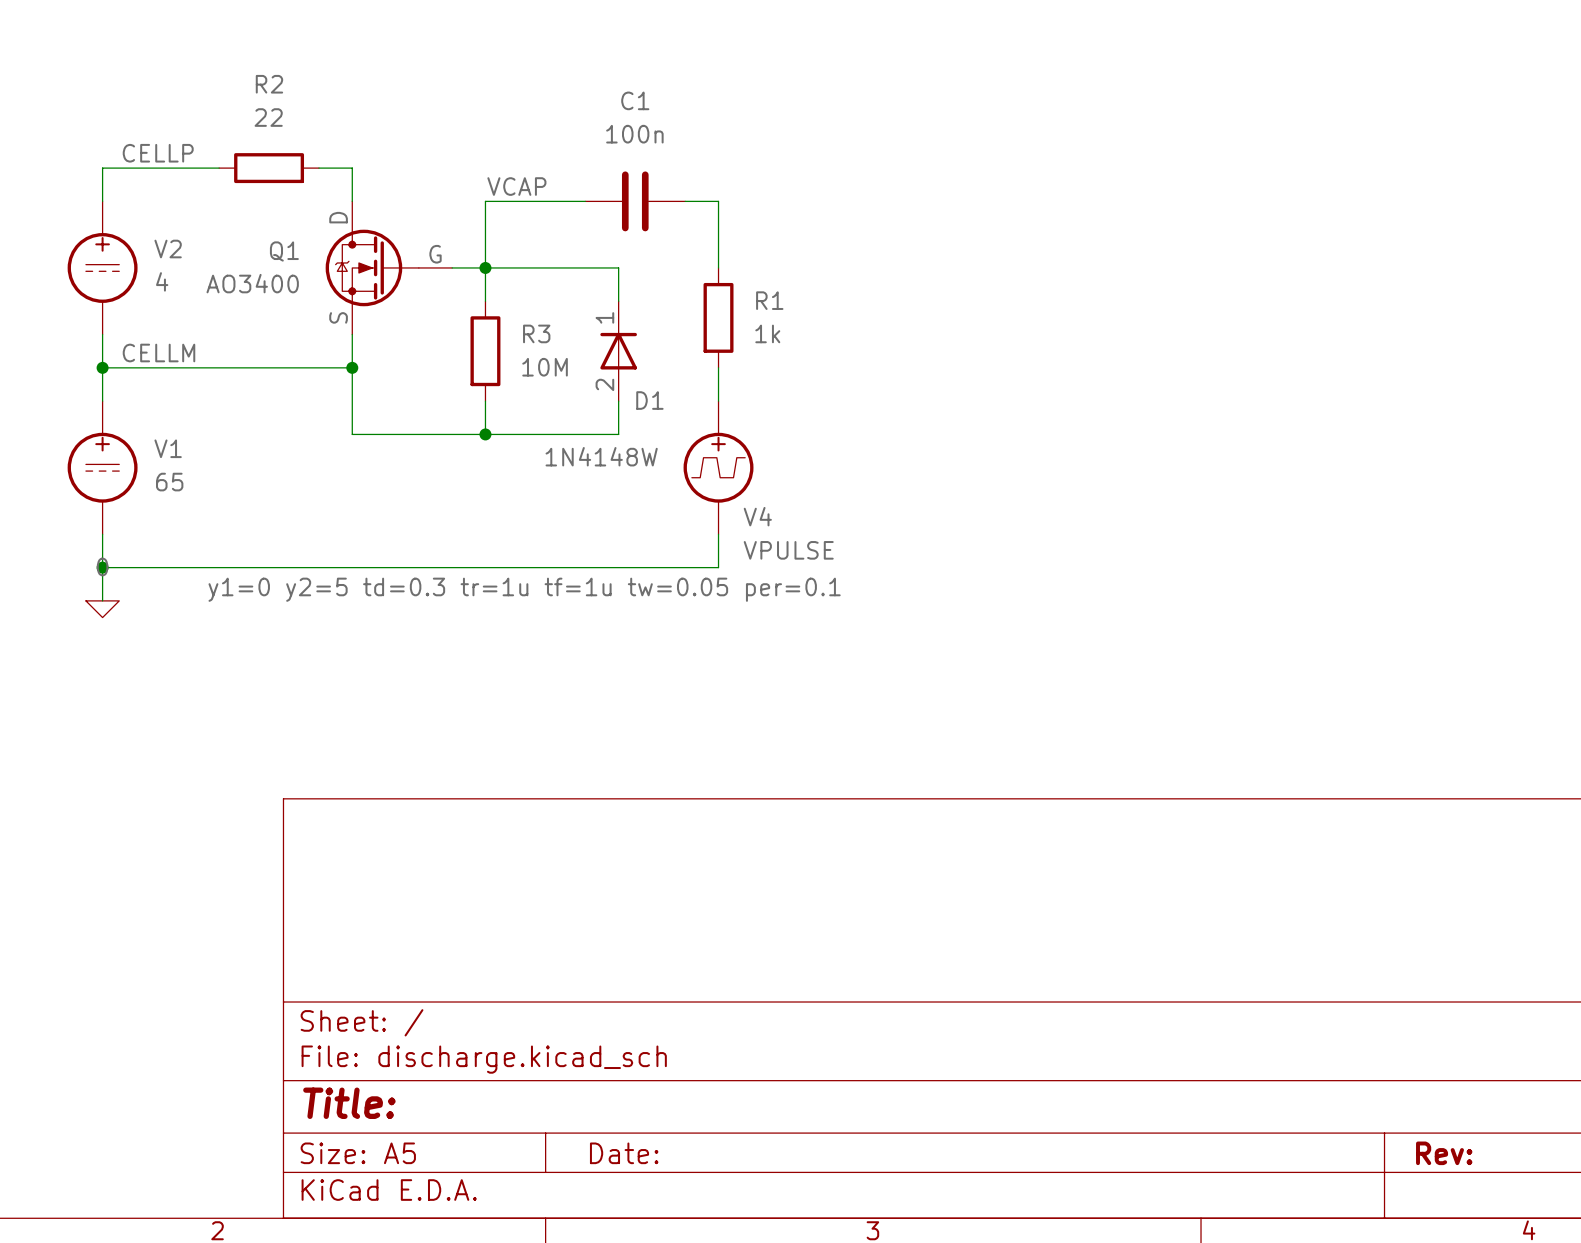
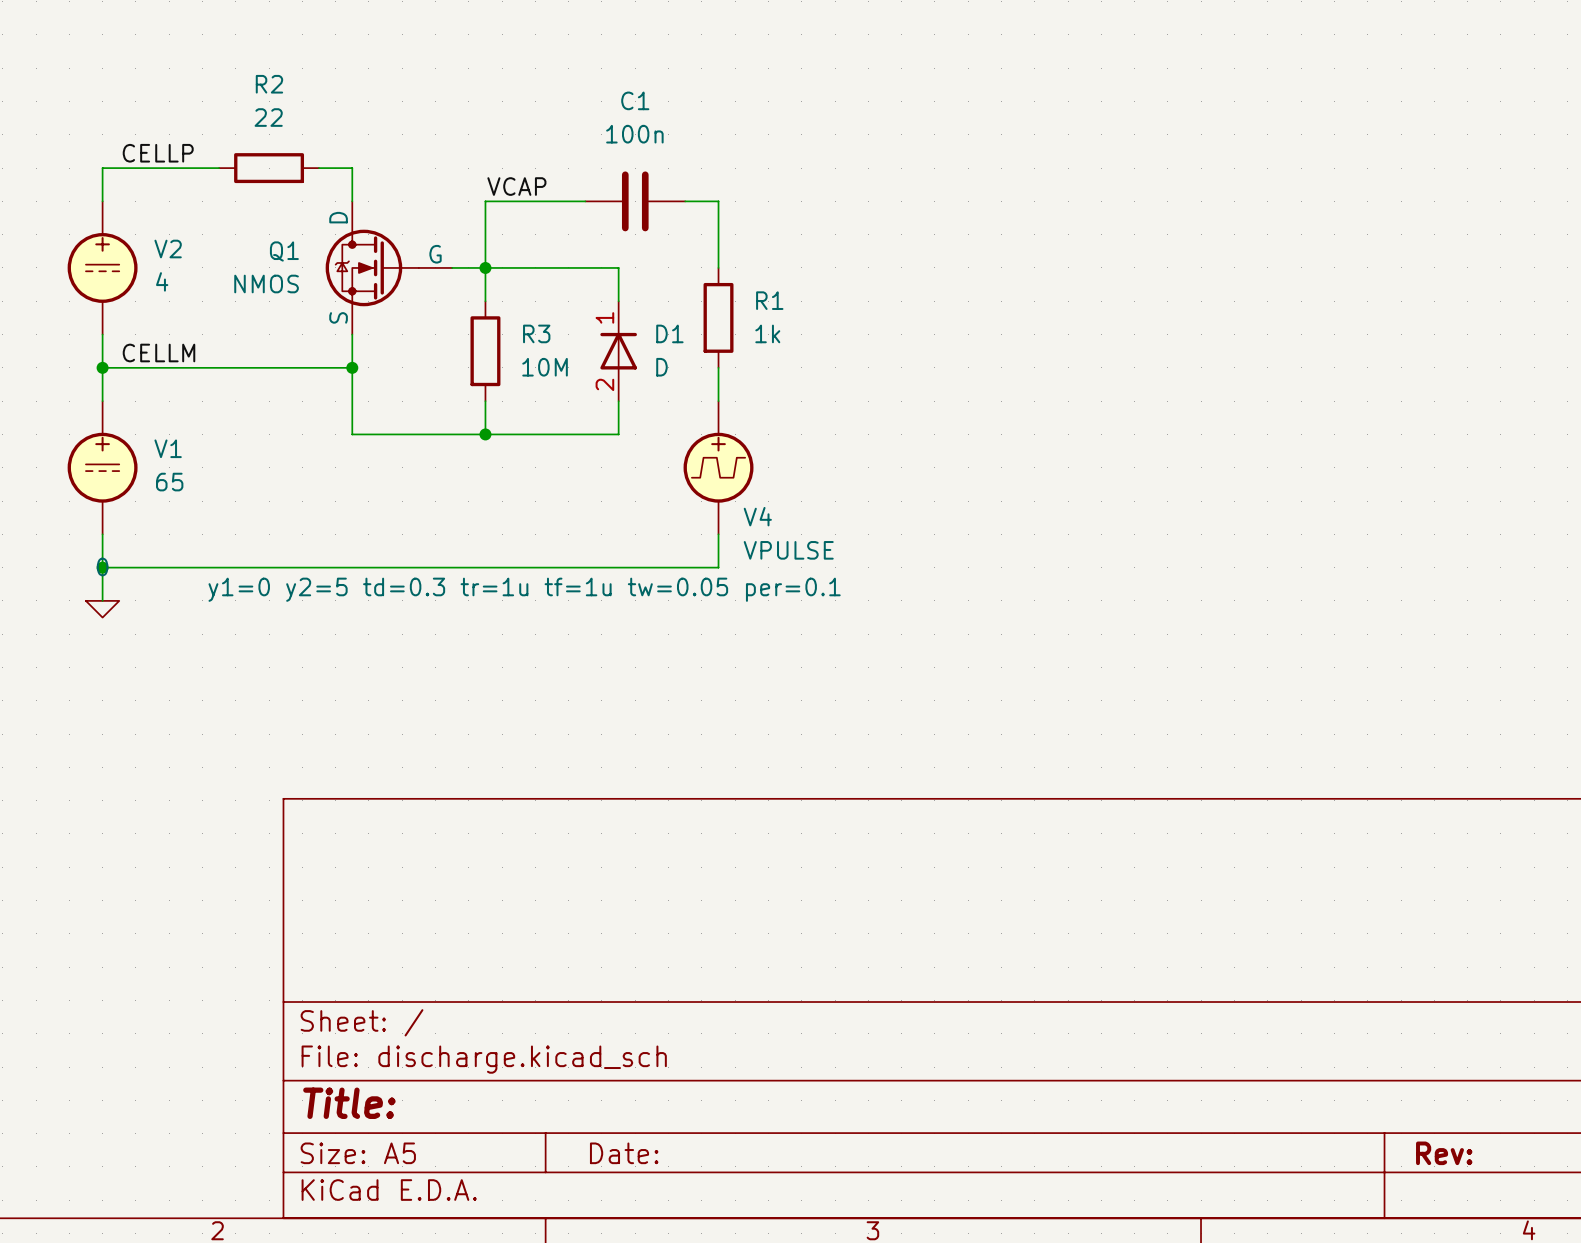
Q1 value: AO3400 (252, 283) -> NMOS (266, 284)
D1 name position: D1 (649, 400) -> D1 (669, 333)
D1 value: 1N4148W (601, 456) -> D (661, 367)

